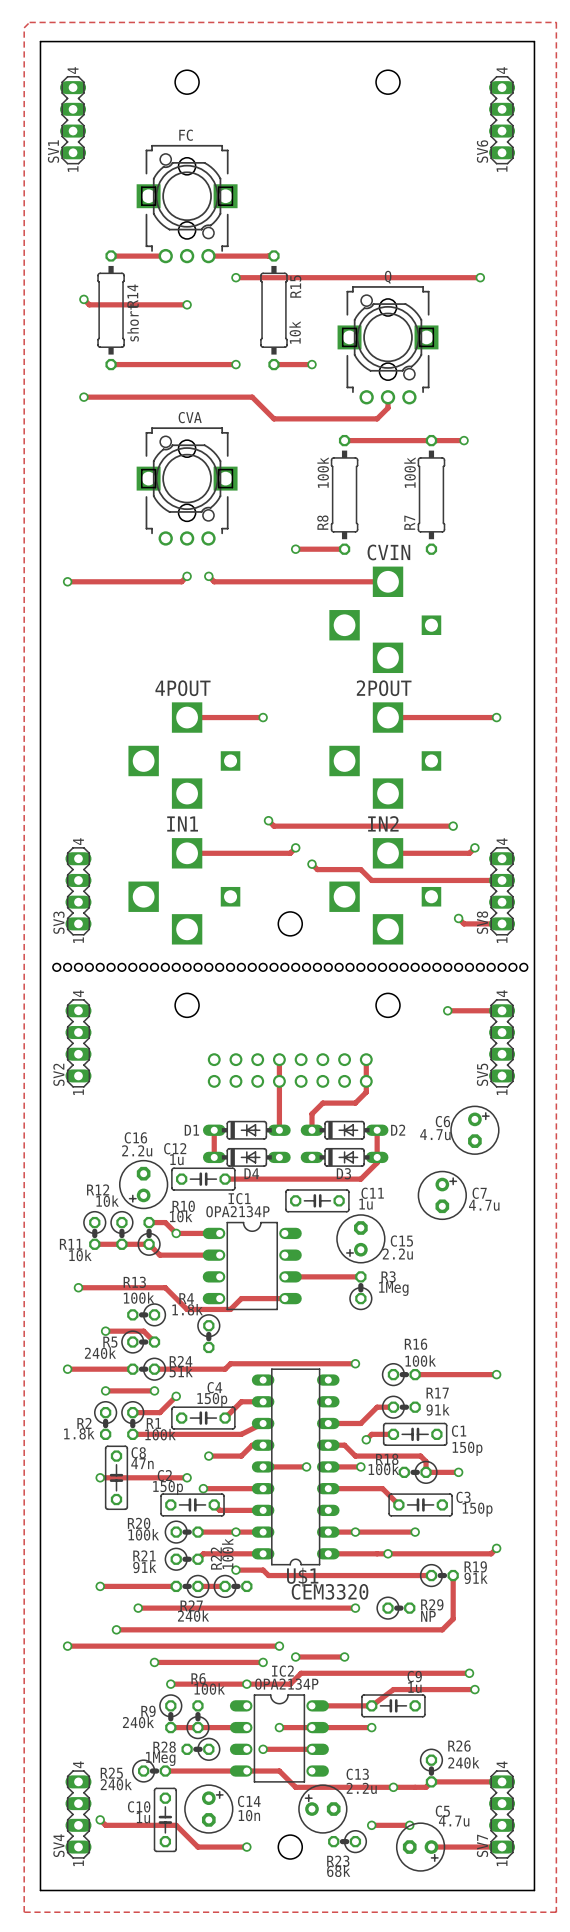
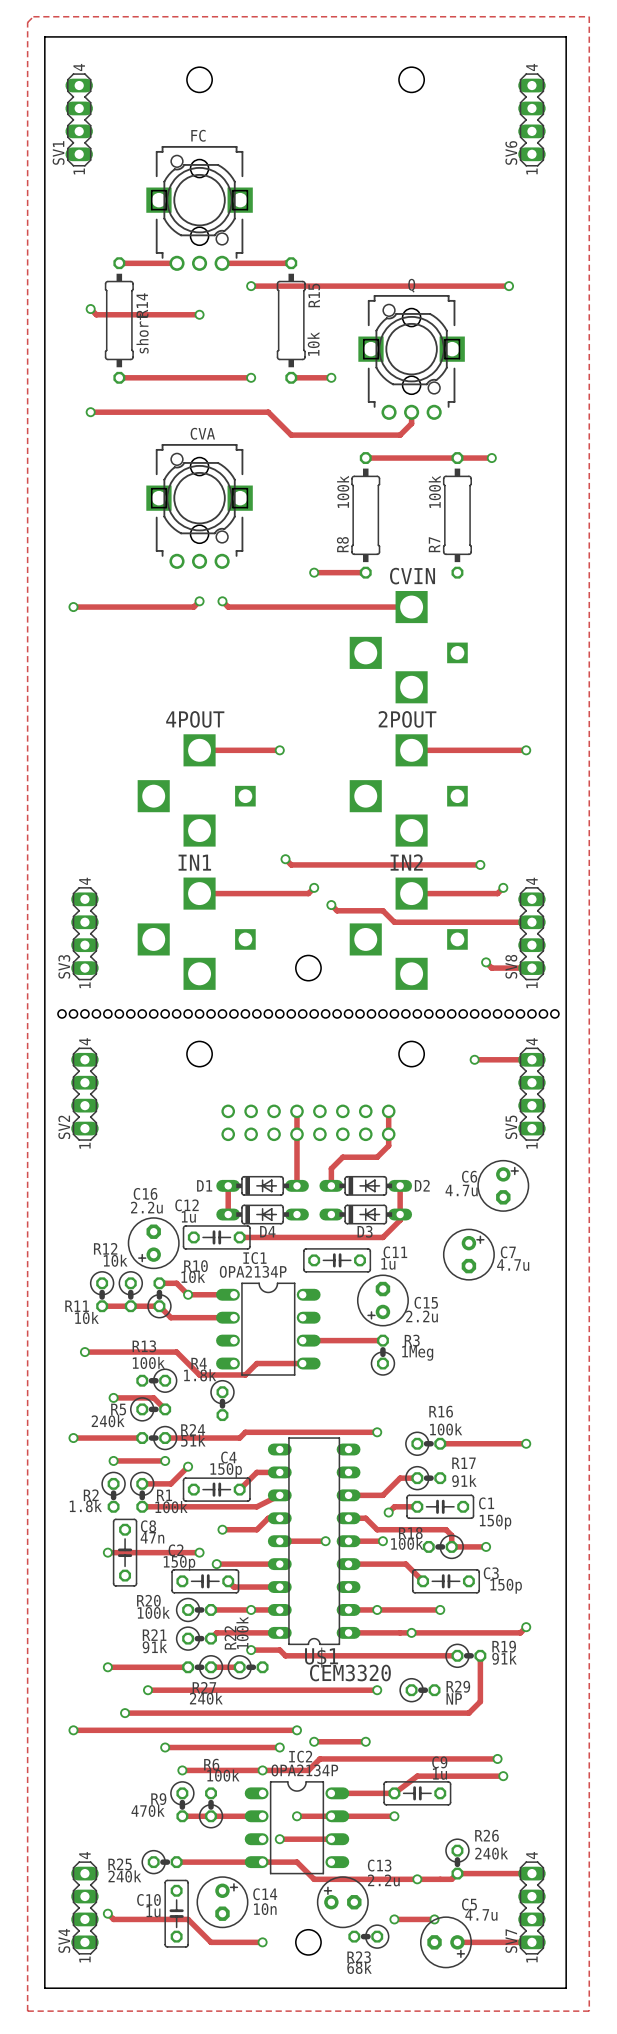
R9 value: 240k (138, 1722) -> 470k (148, 1810)
R28: 1Meg (200, 1749) -> none

